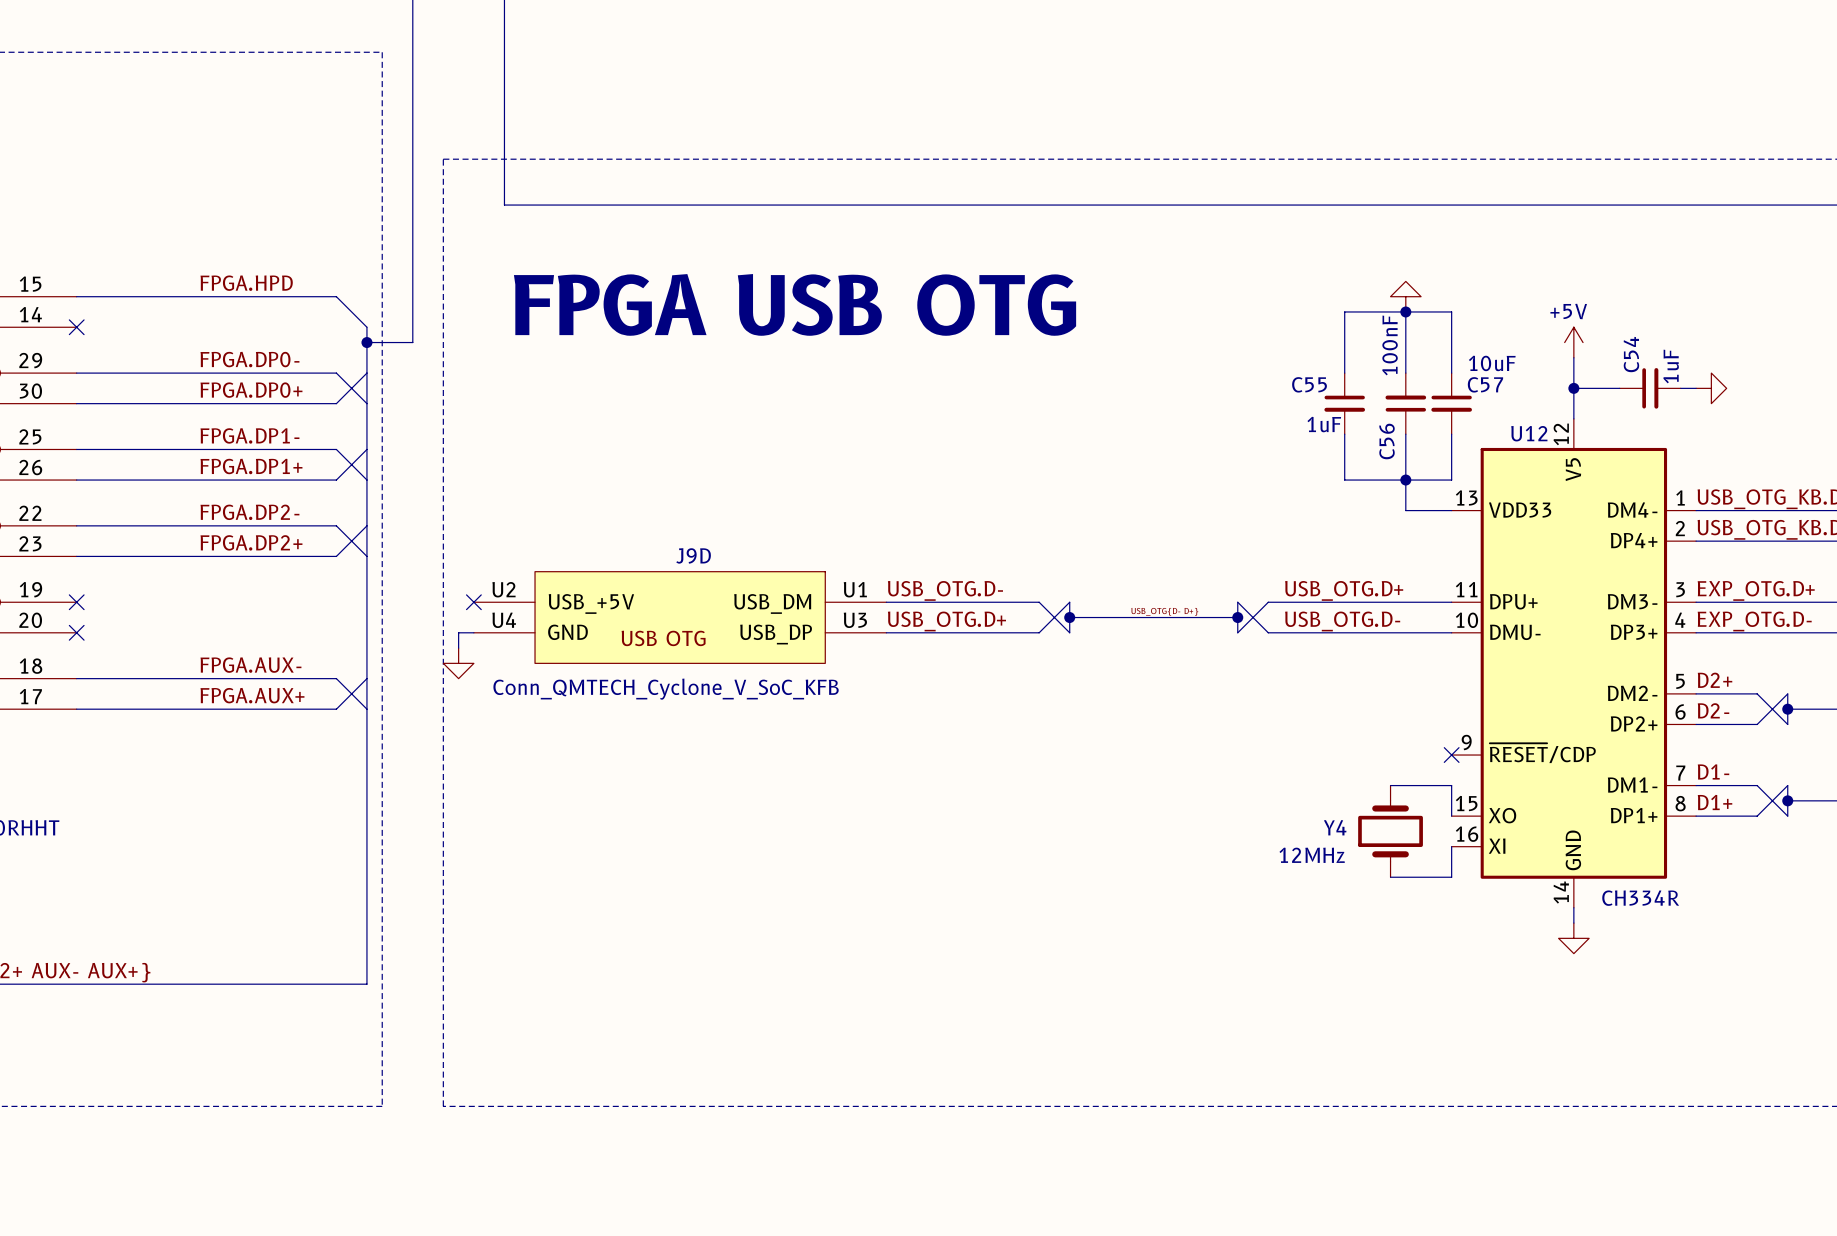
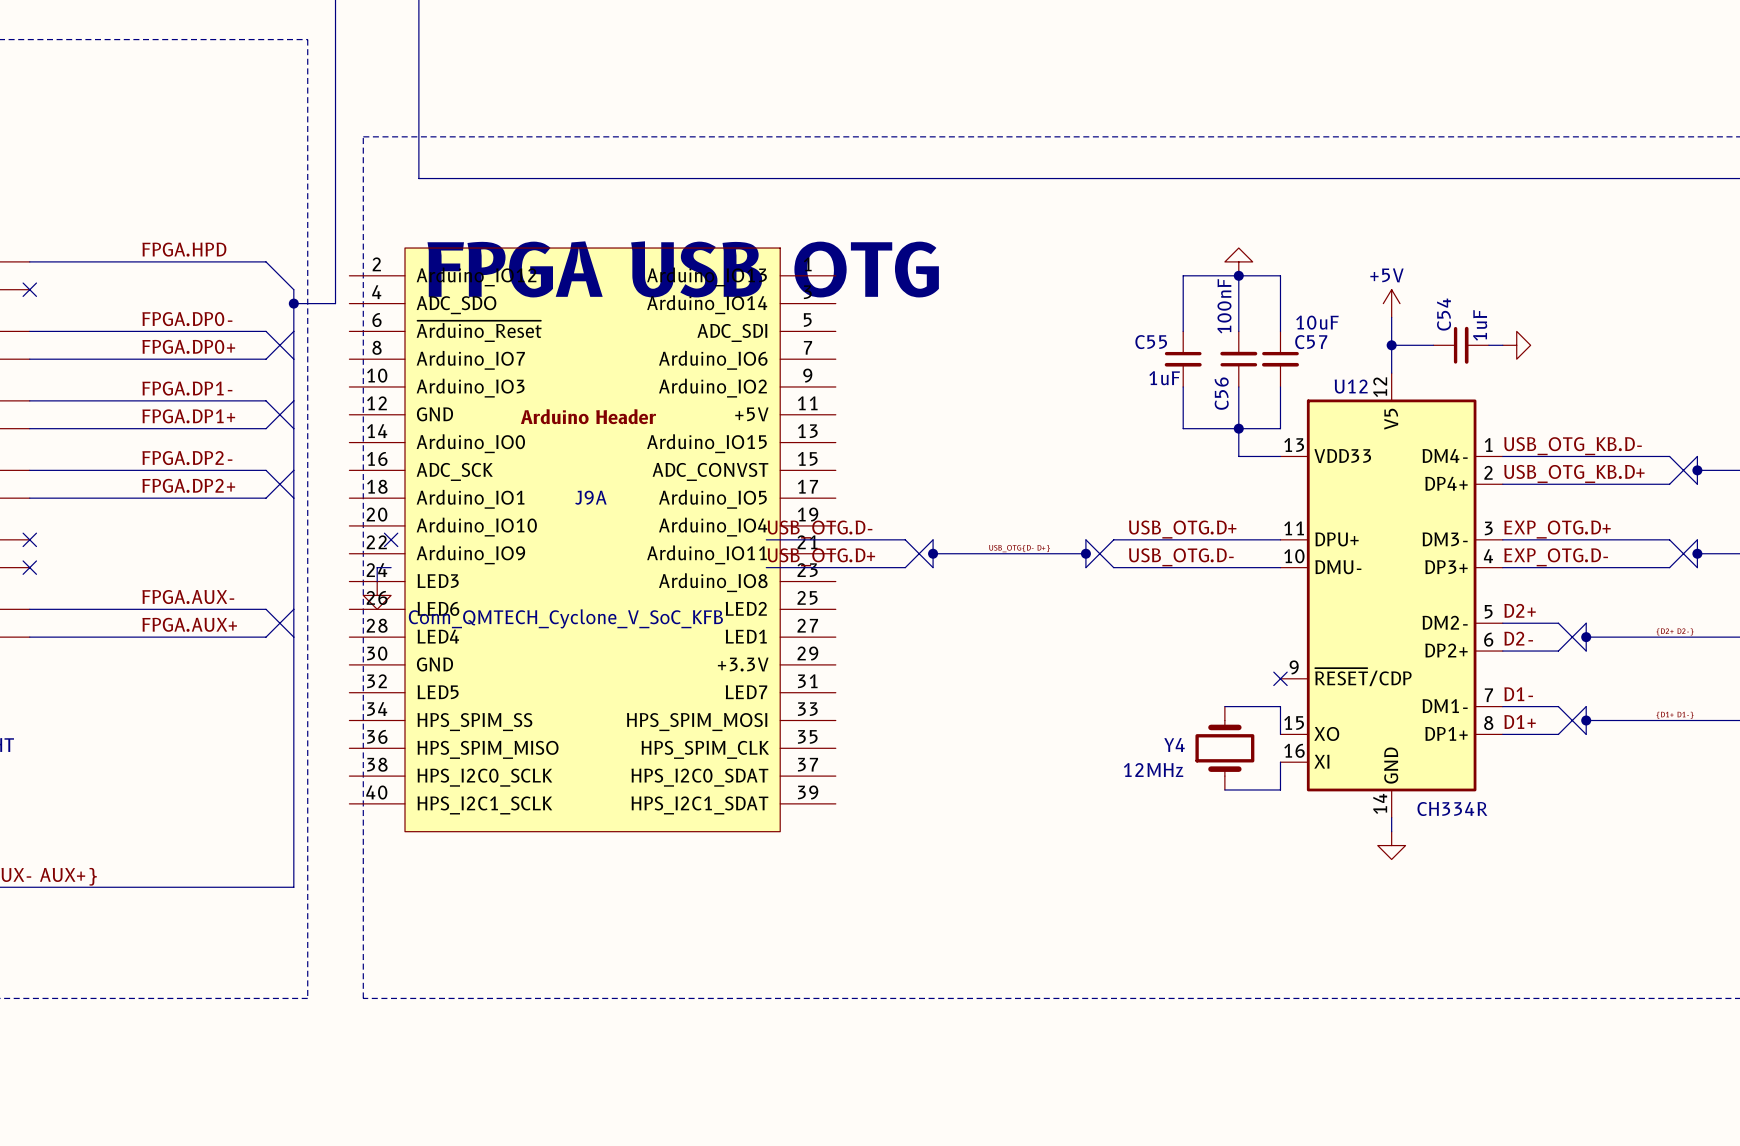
J9A: none -> Conn_QMTECH_Cyclone_V_SoC_KFB (592, 539)
J9D: Conn_QMTECH_Cyclone_V_SoC_KFB (680, 617) -> none

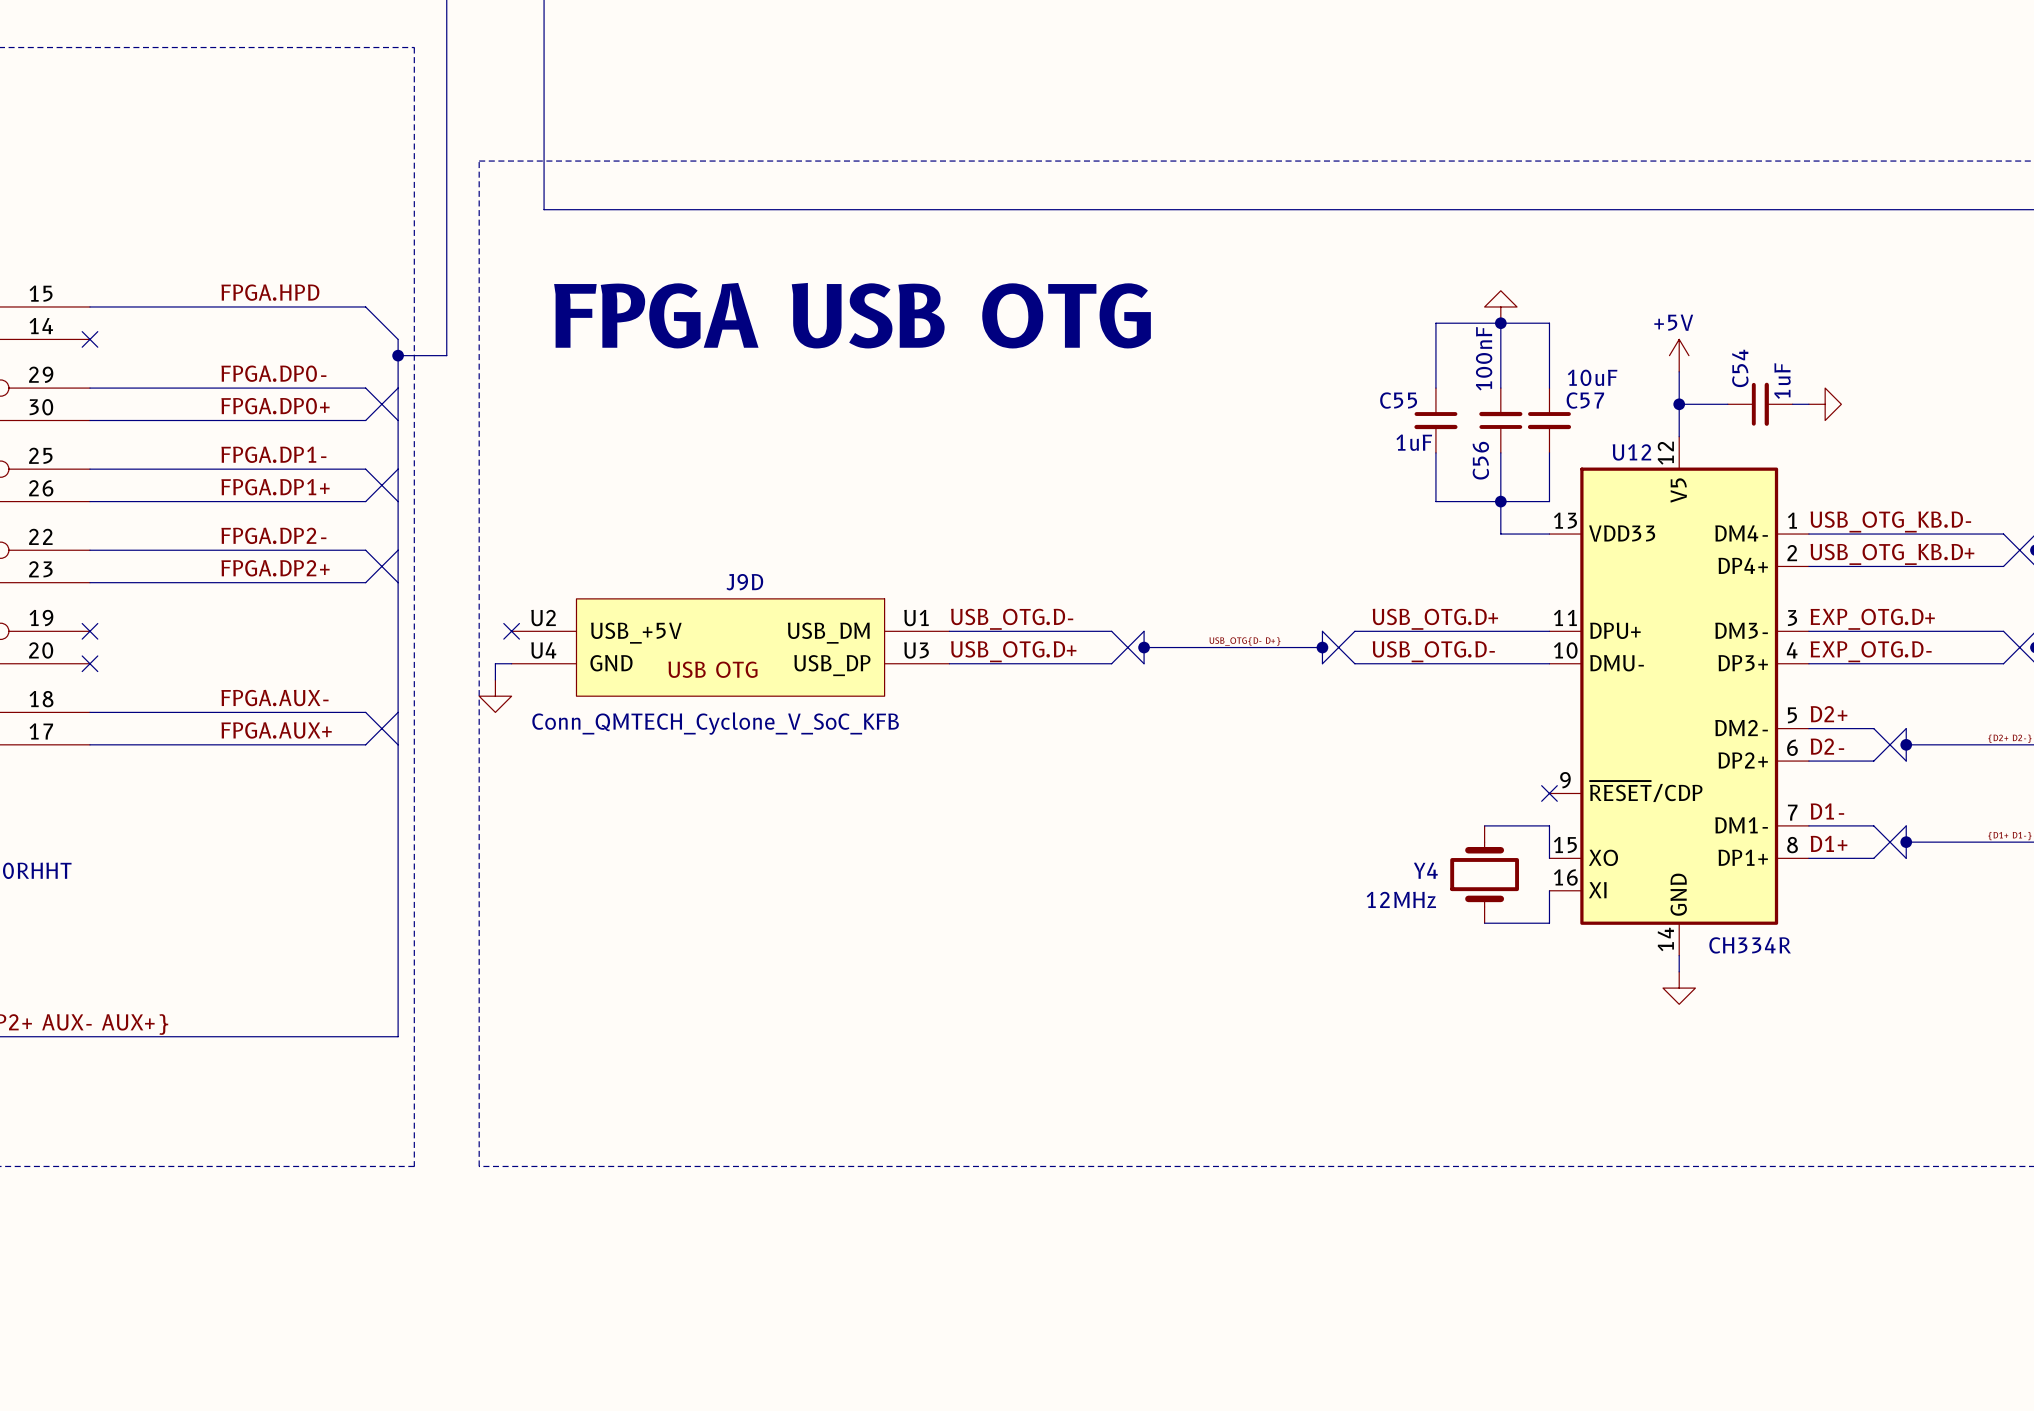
J9A: Conn_QMTECH_Cyclone_V_SoC_KFB (592, 539) -> none
J9D: none -> Conn_QMTECH_Cyclone_V_SoC_KFB (730, 647)

